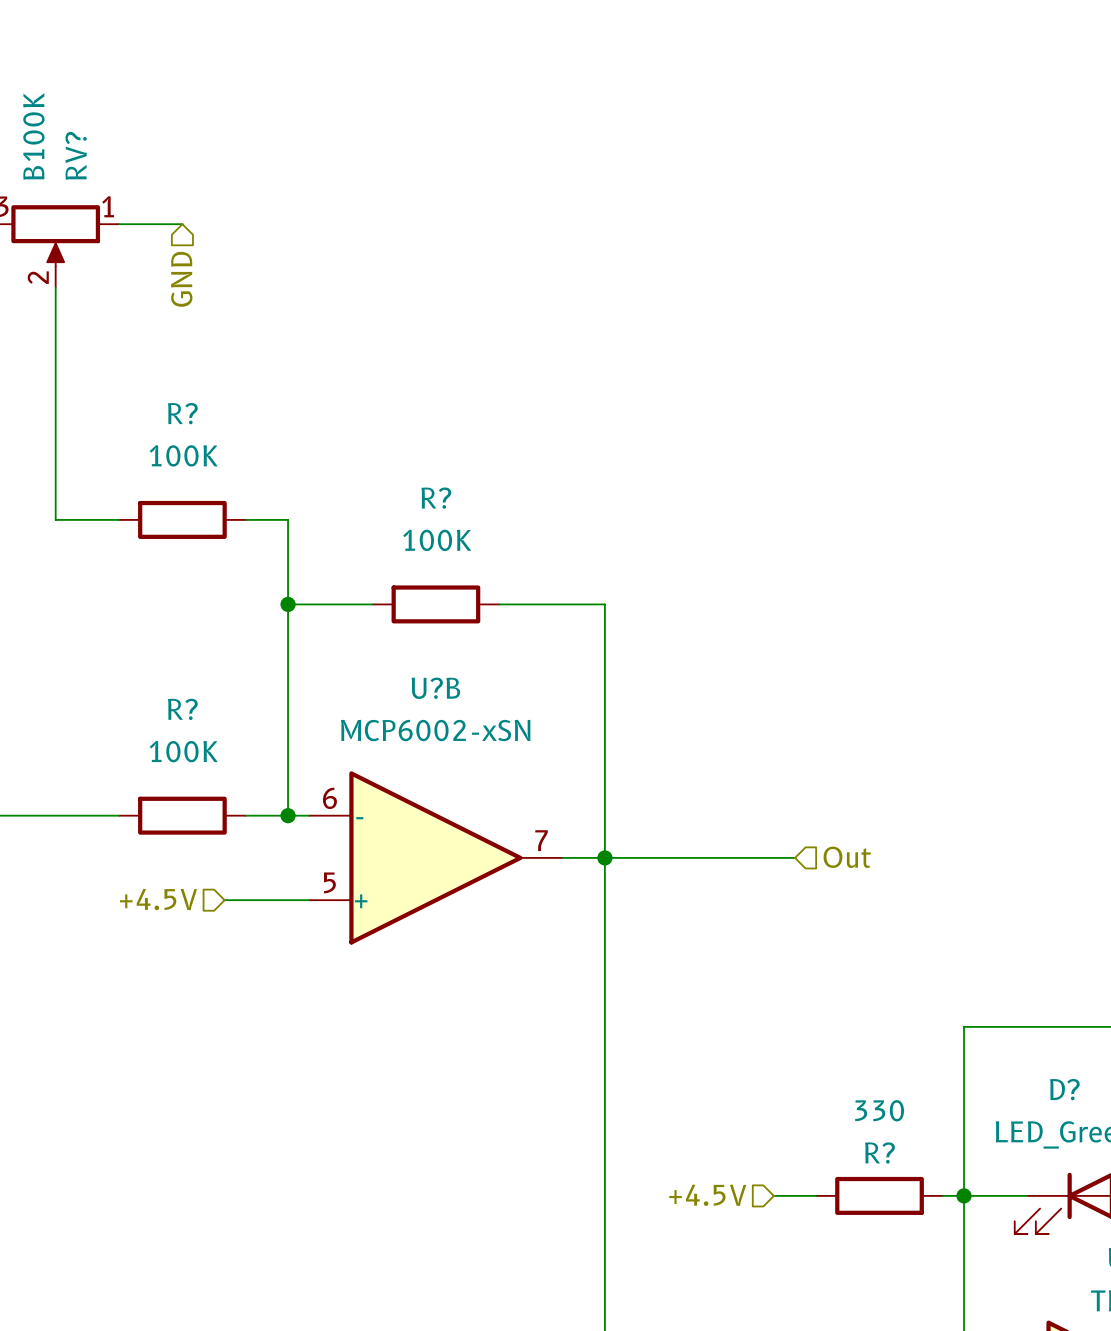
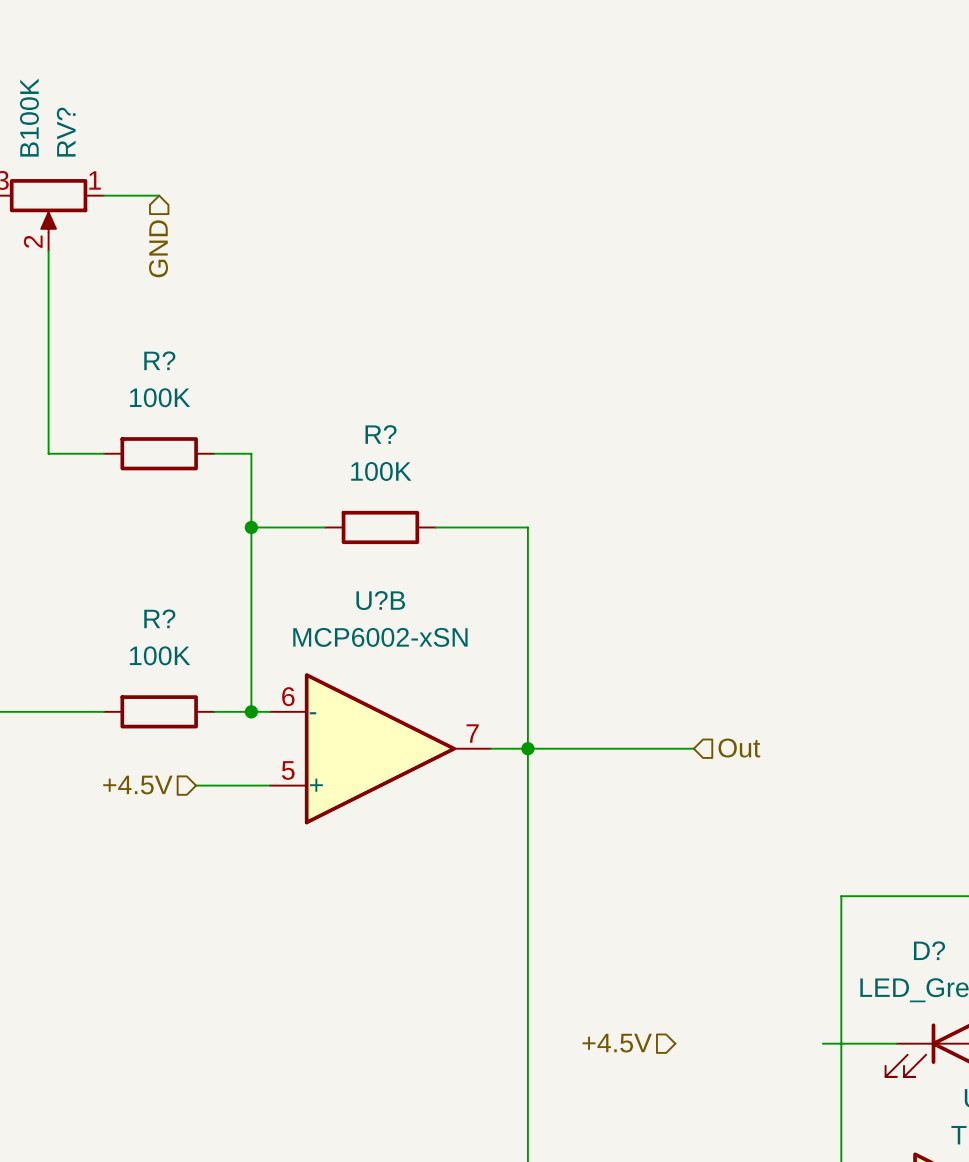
wire: (773, 1195) (816, 1195) -> none
R?: 330 (879, 1195) -> none
junction: (964, 1195) -> none

